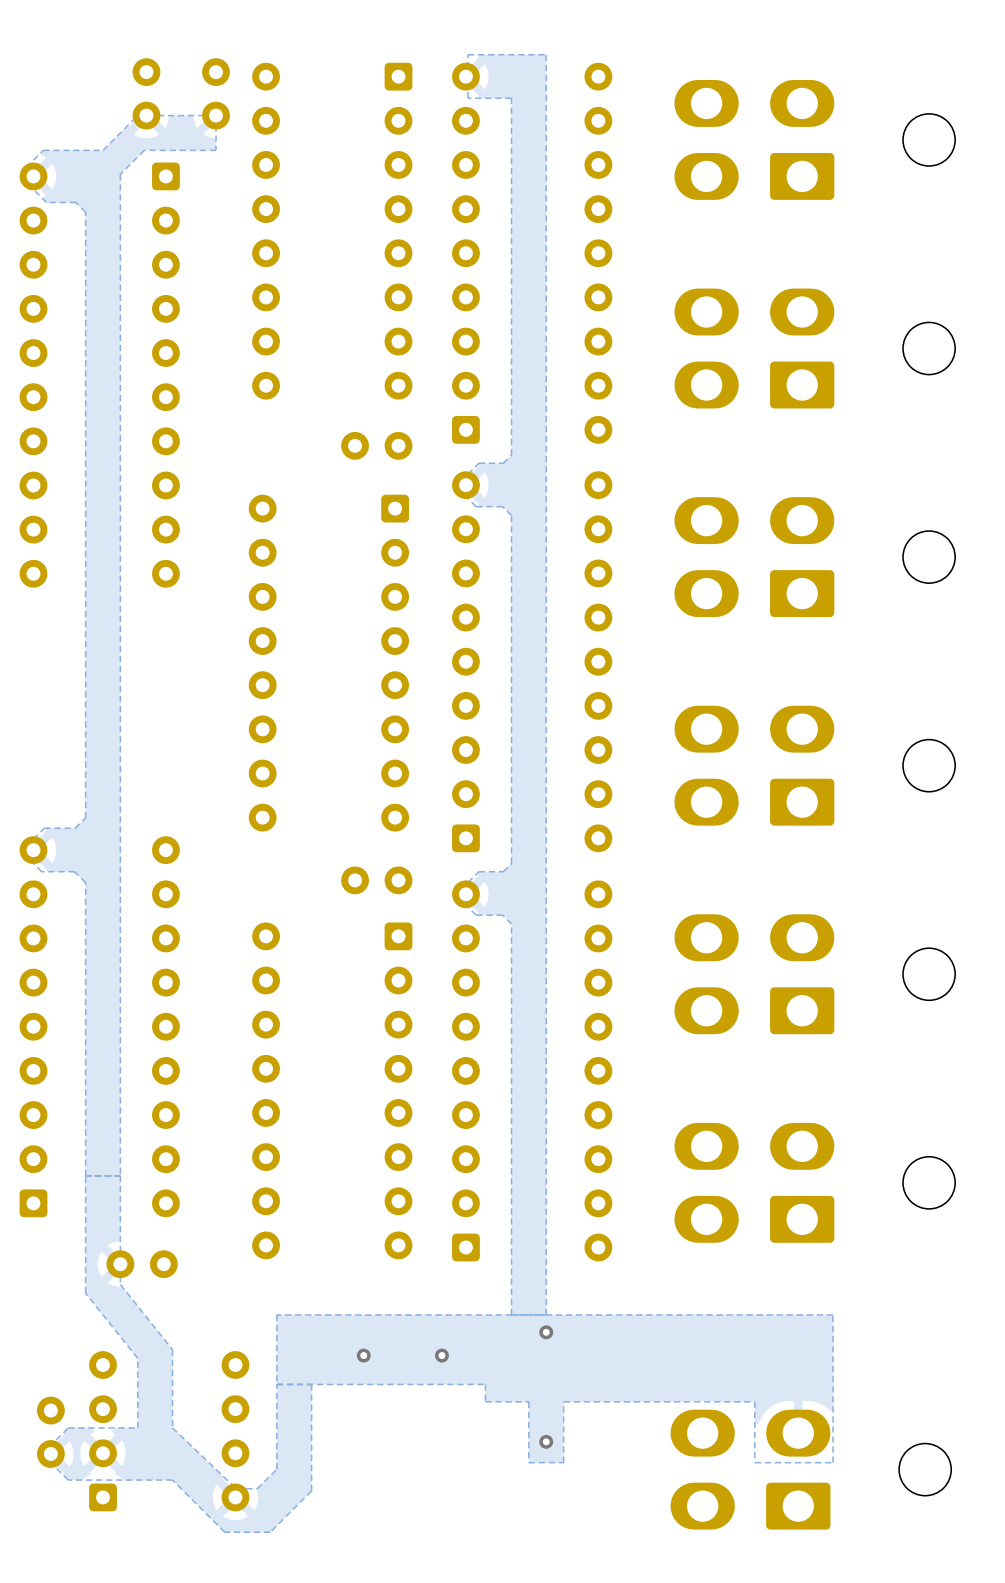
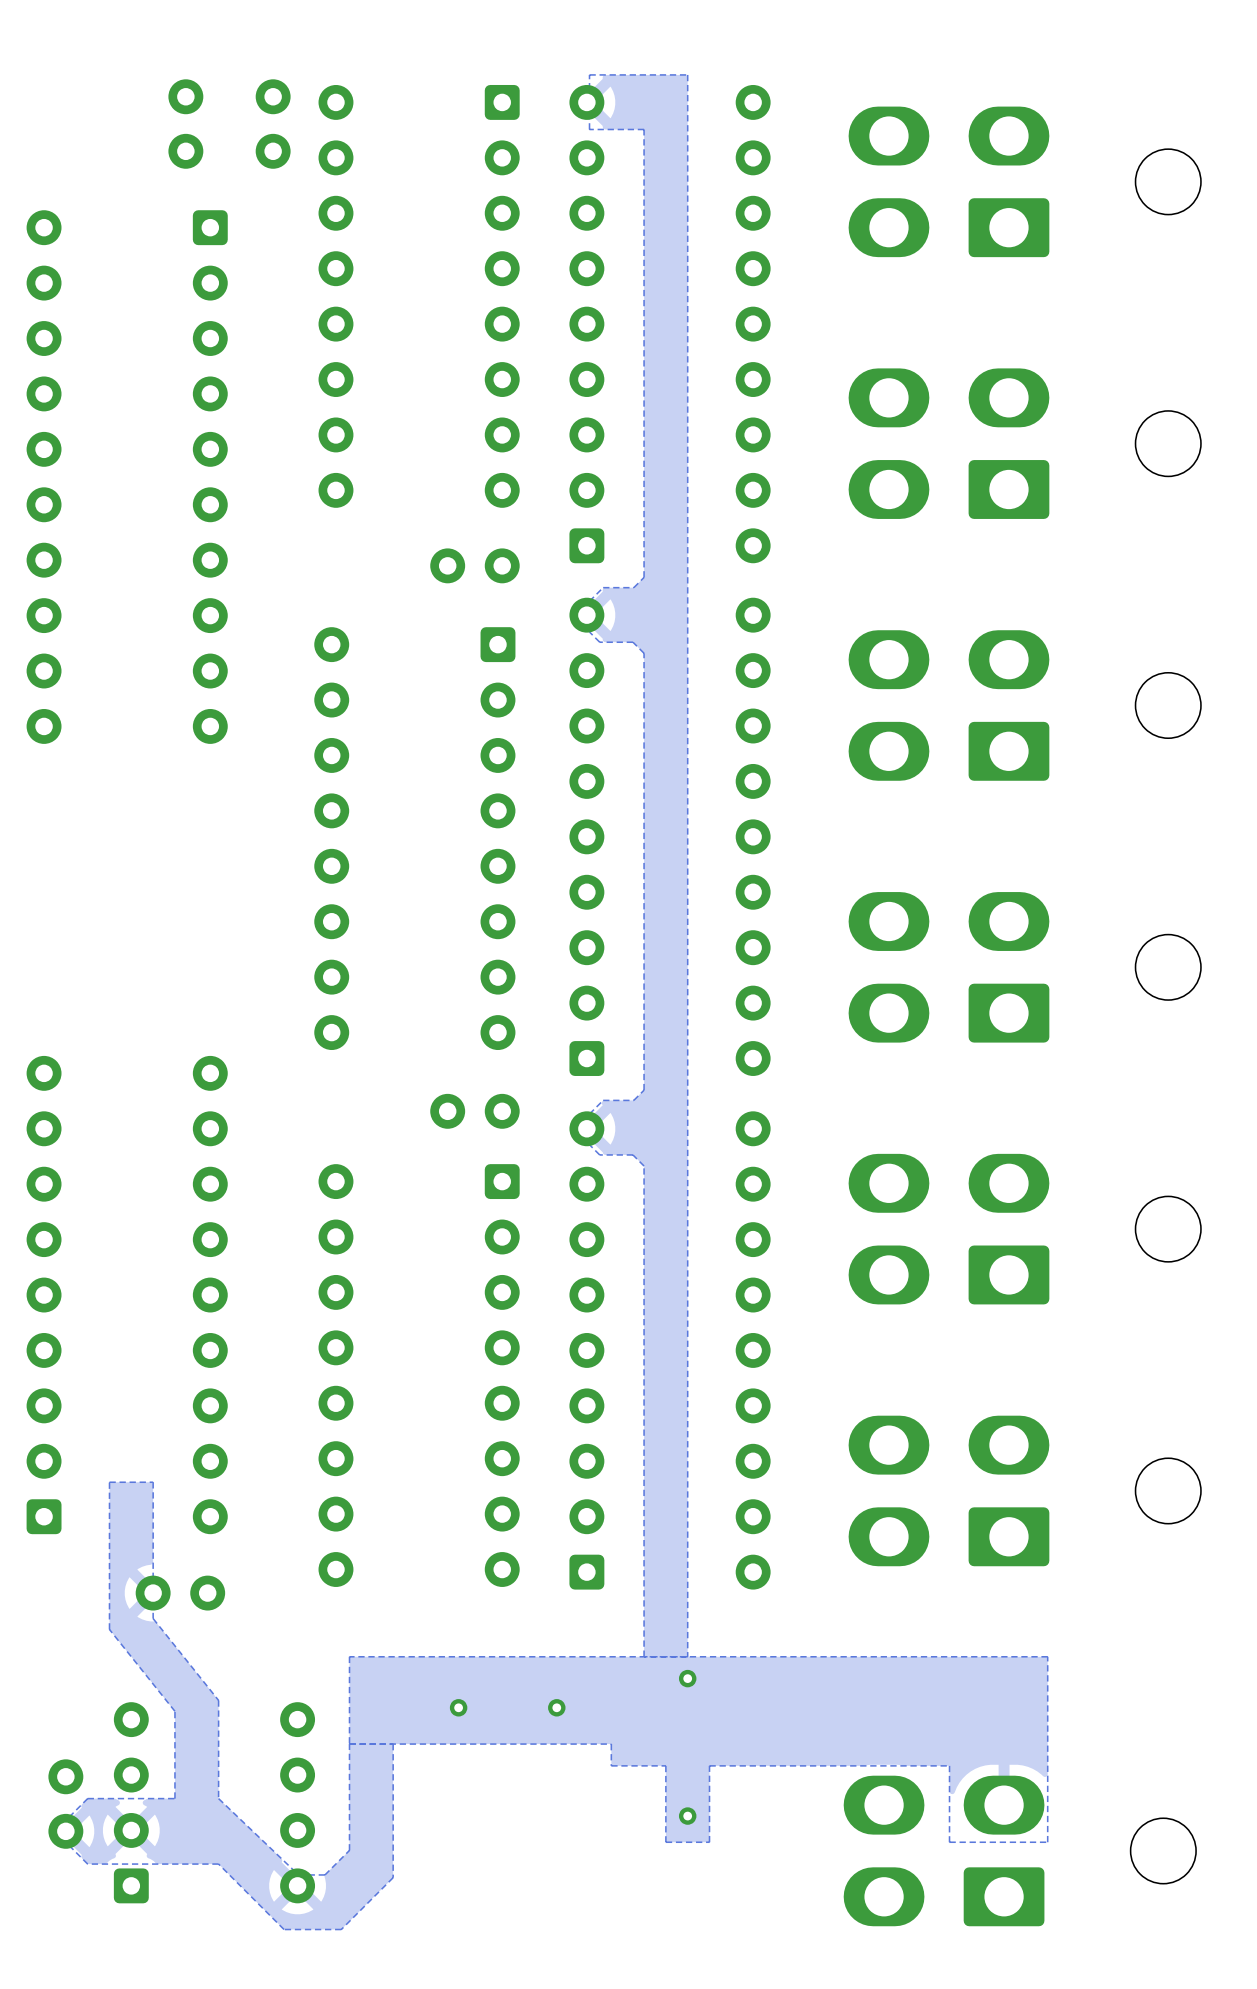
zone outline: (120, 1175) (120, 174) (144, 150) (216, 150) (216, 115) (137, 115) (103, 150) (43, 150) (33, 160) (33, 189) (46, 202) (75, 202) (85, 212) (85, 817) (75, 828) (44, 828) (33, 839) (33, 863) (41, 871) (74, 871) (85, 882) (85, 1175) -> none

